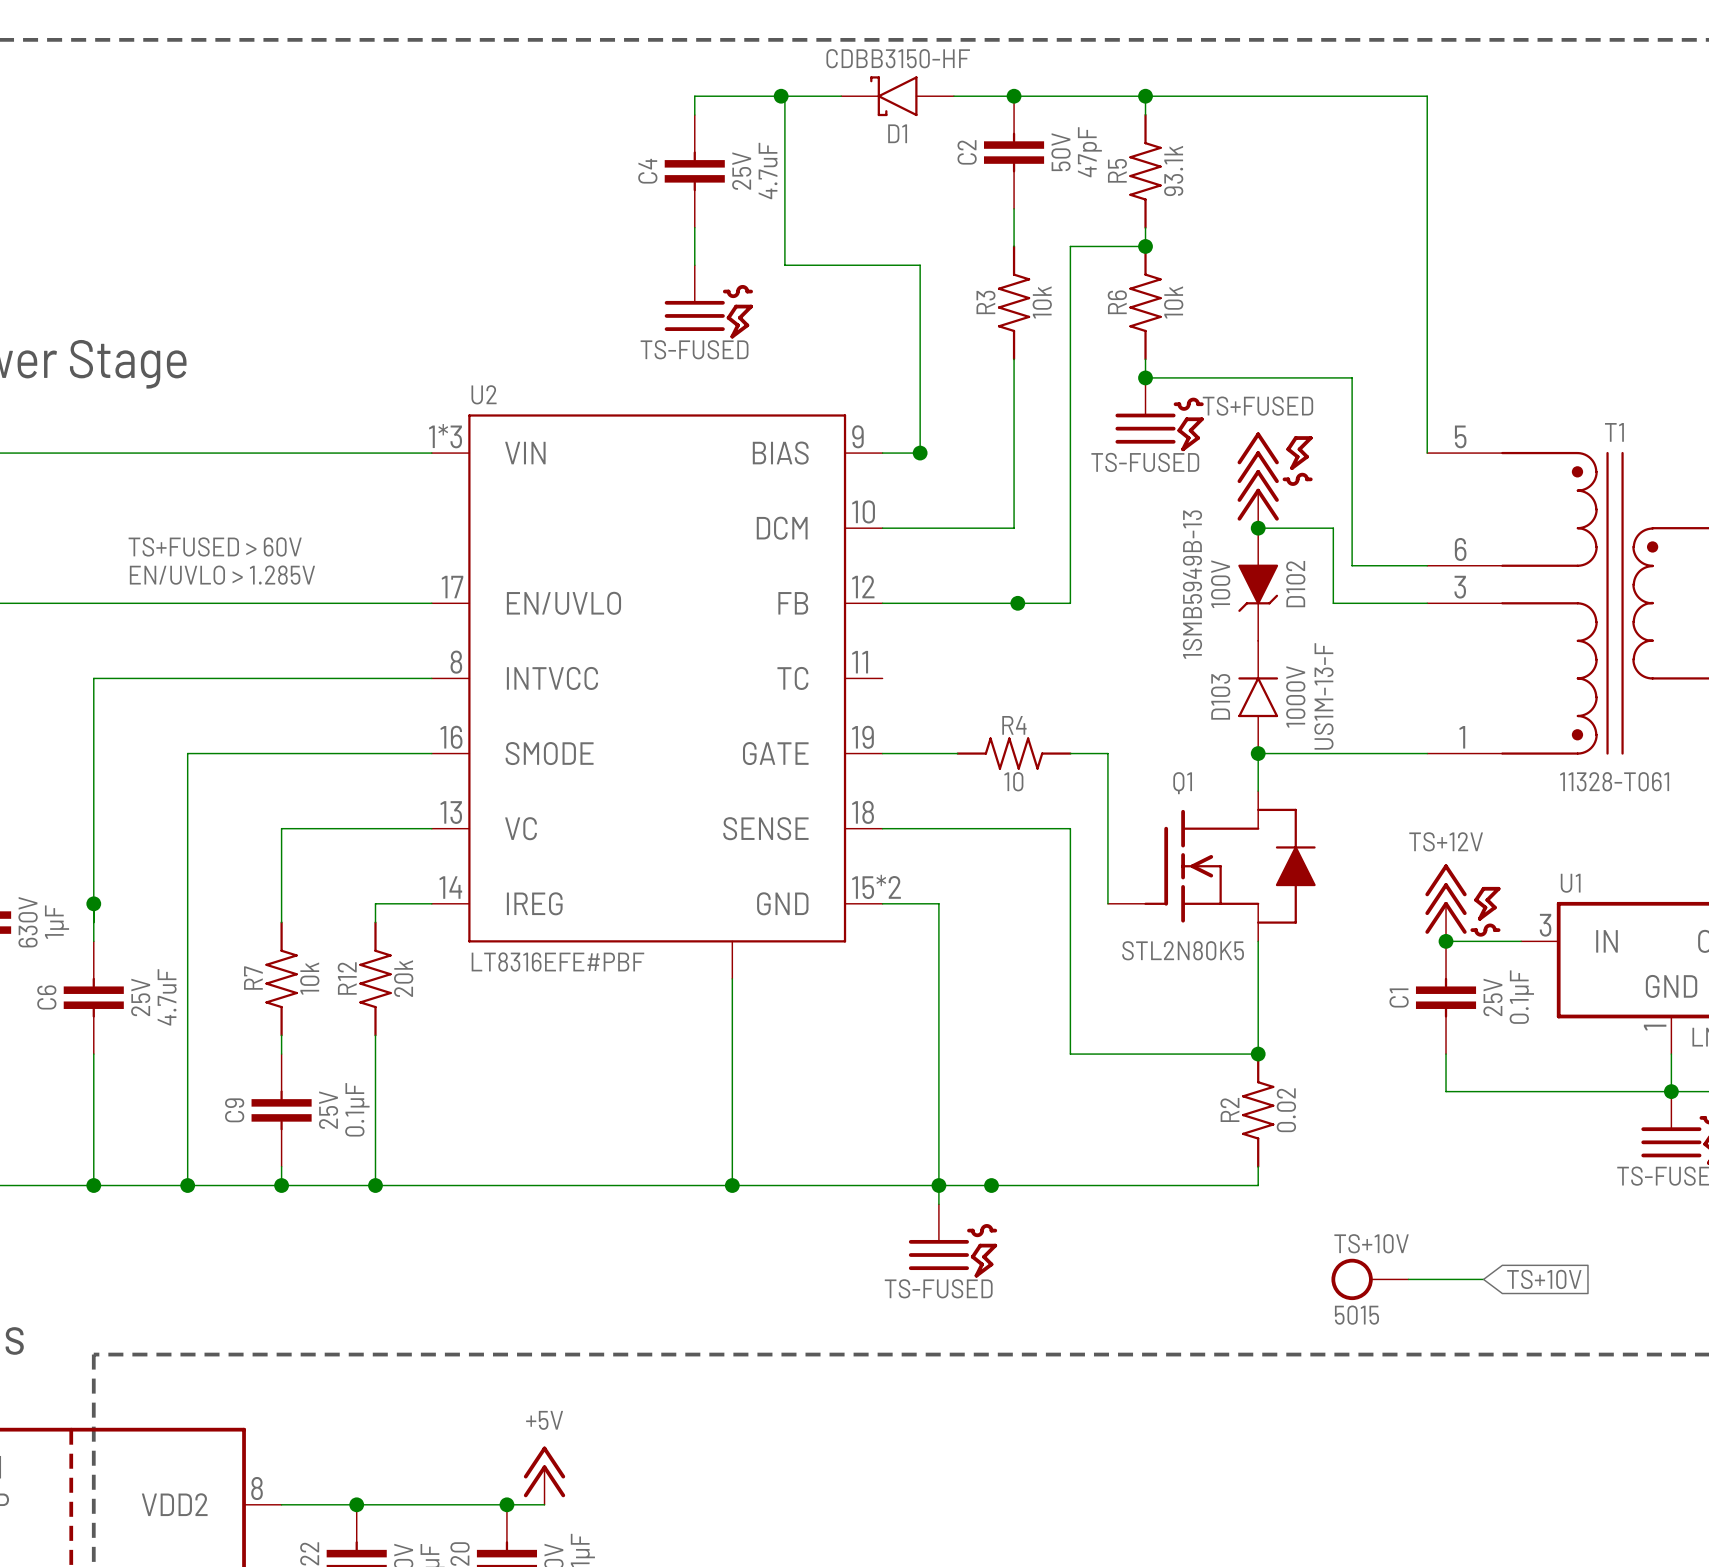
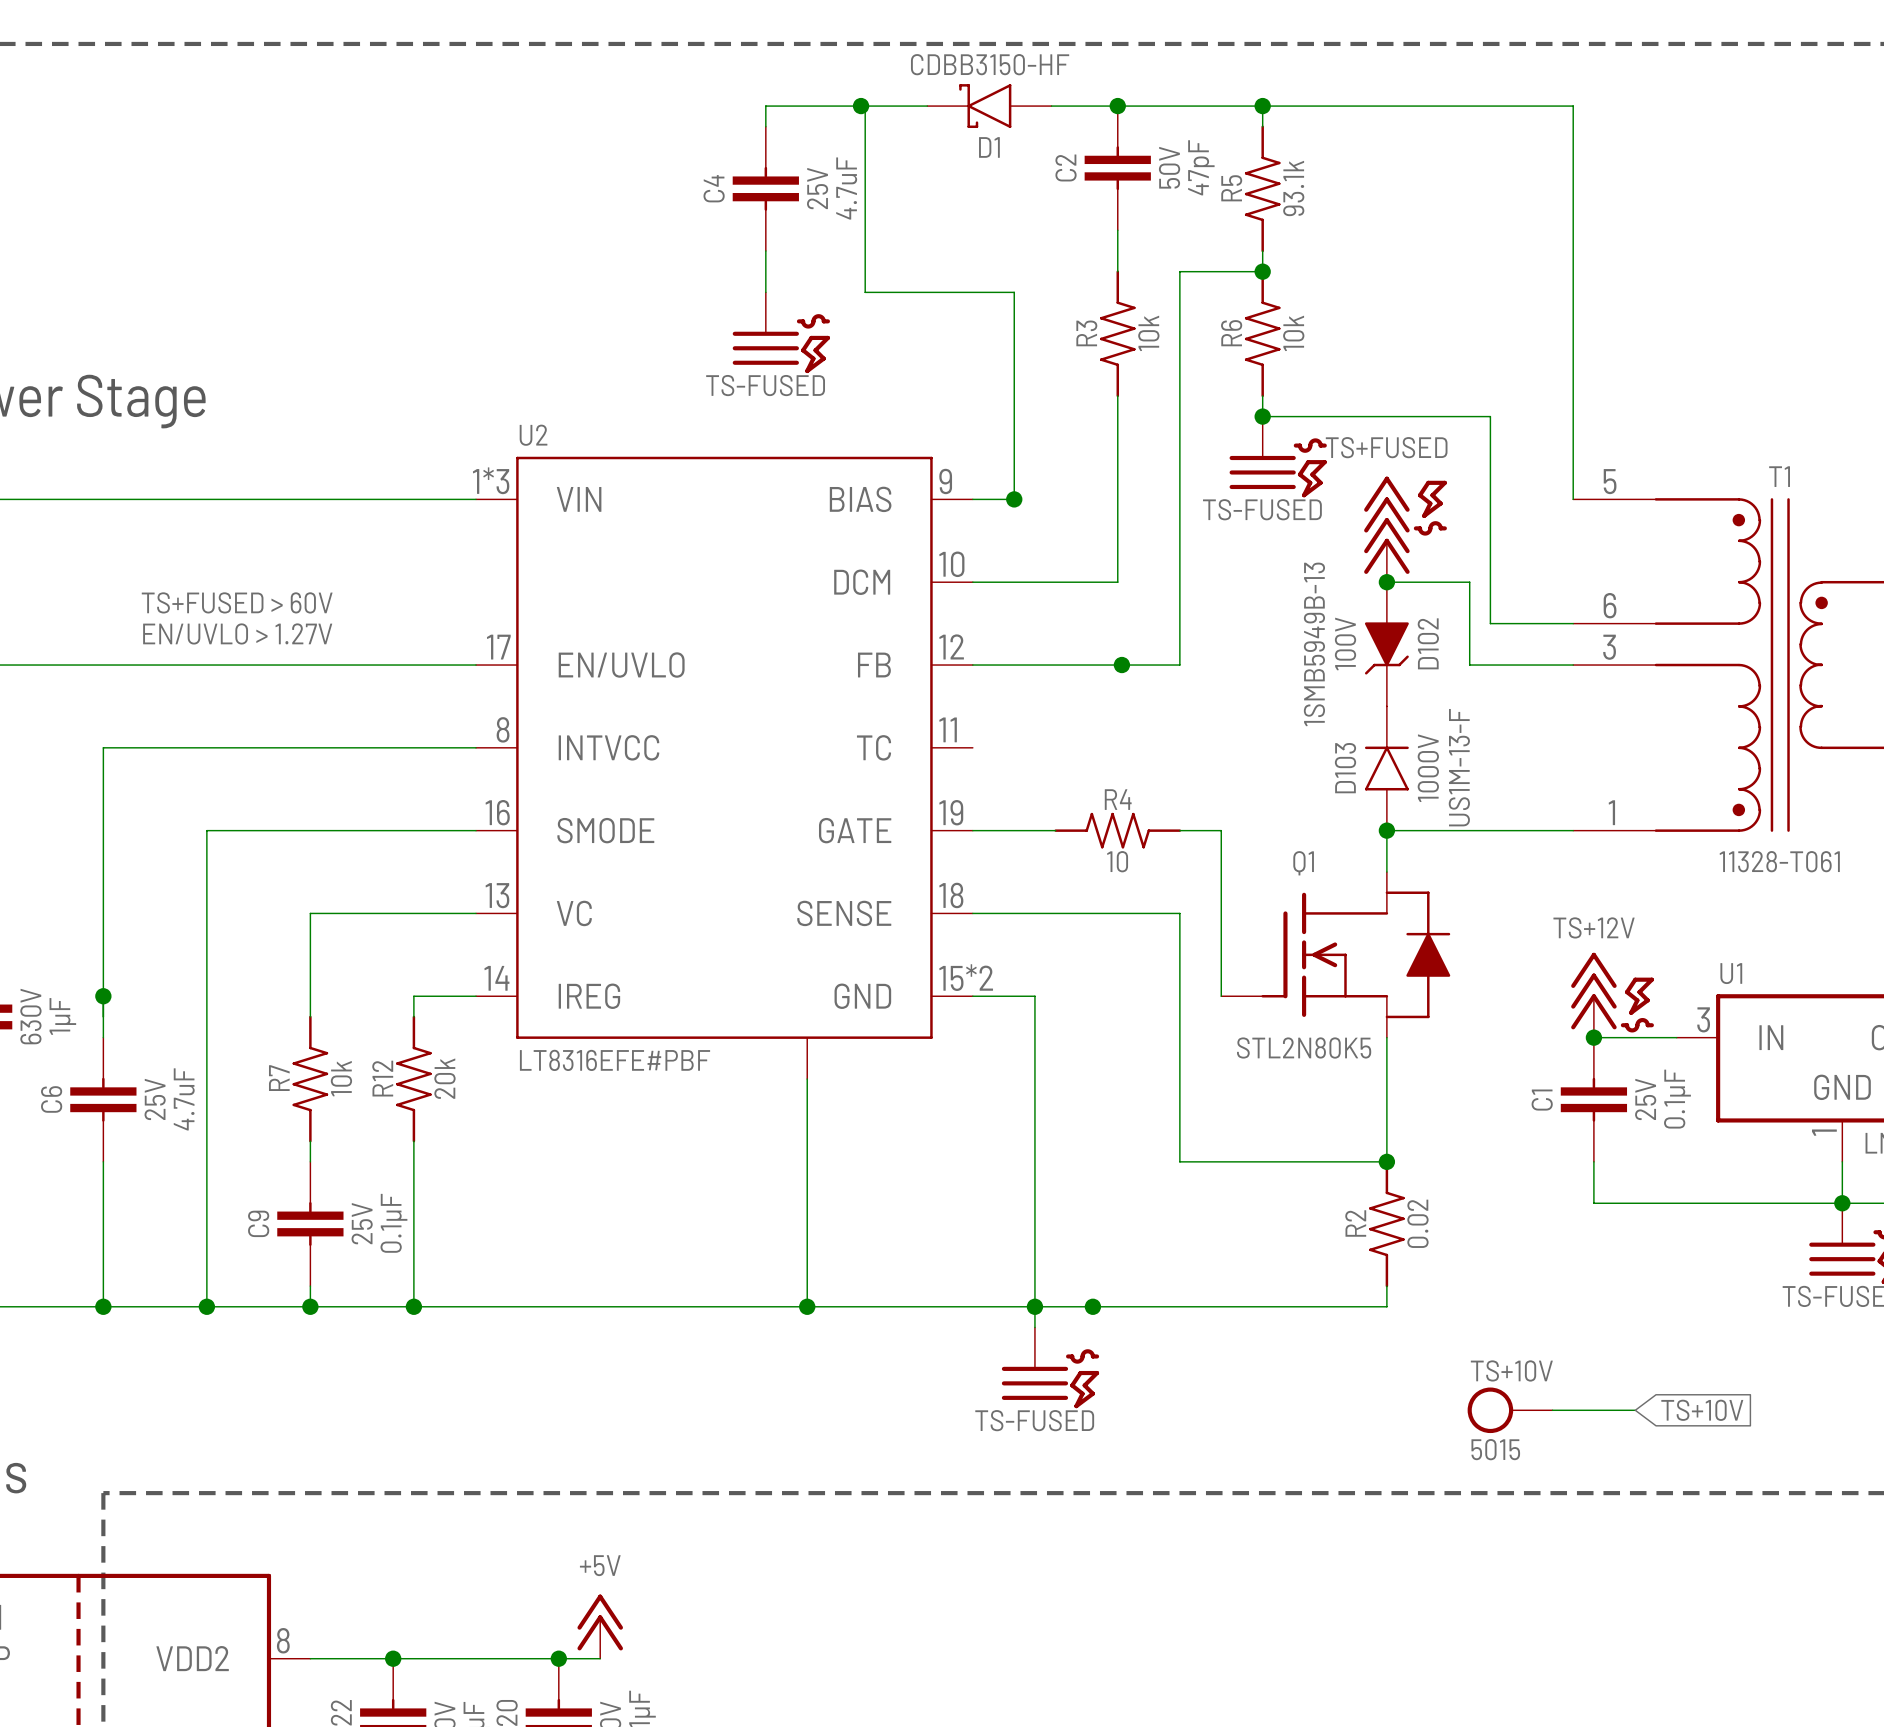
text: EN/UVLO > 1.285V (222, 575) -> EN/UVLO > 1.27V (237, 633)

